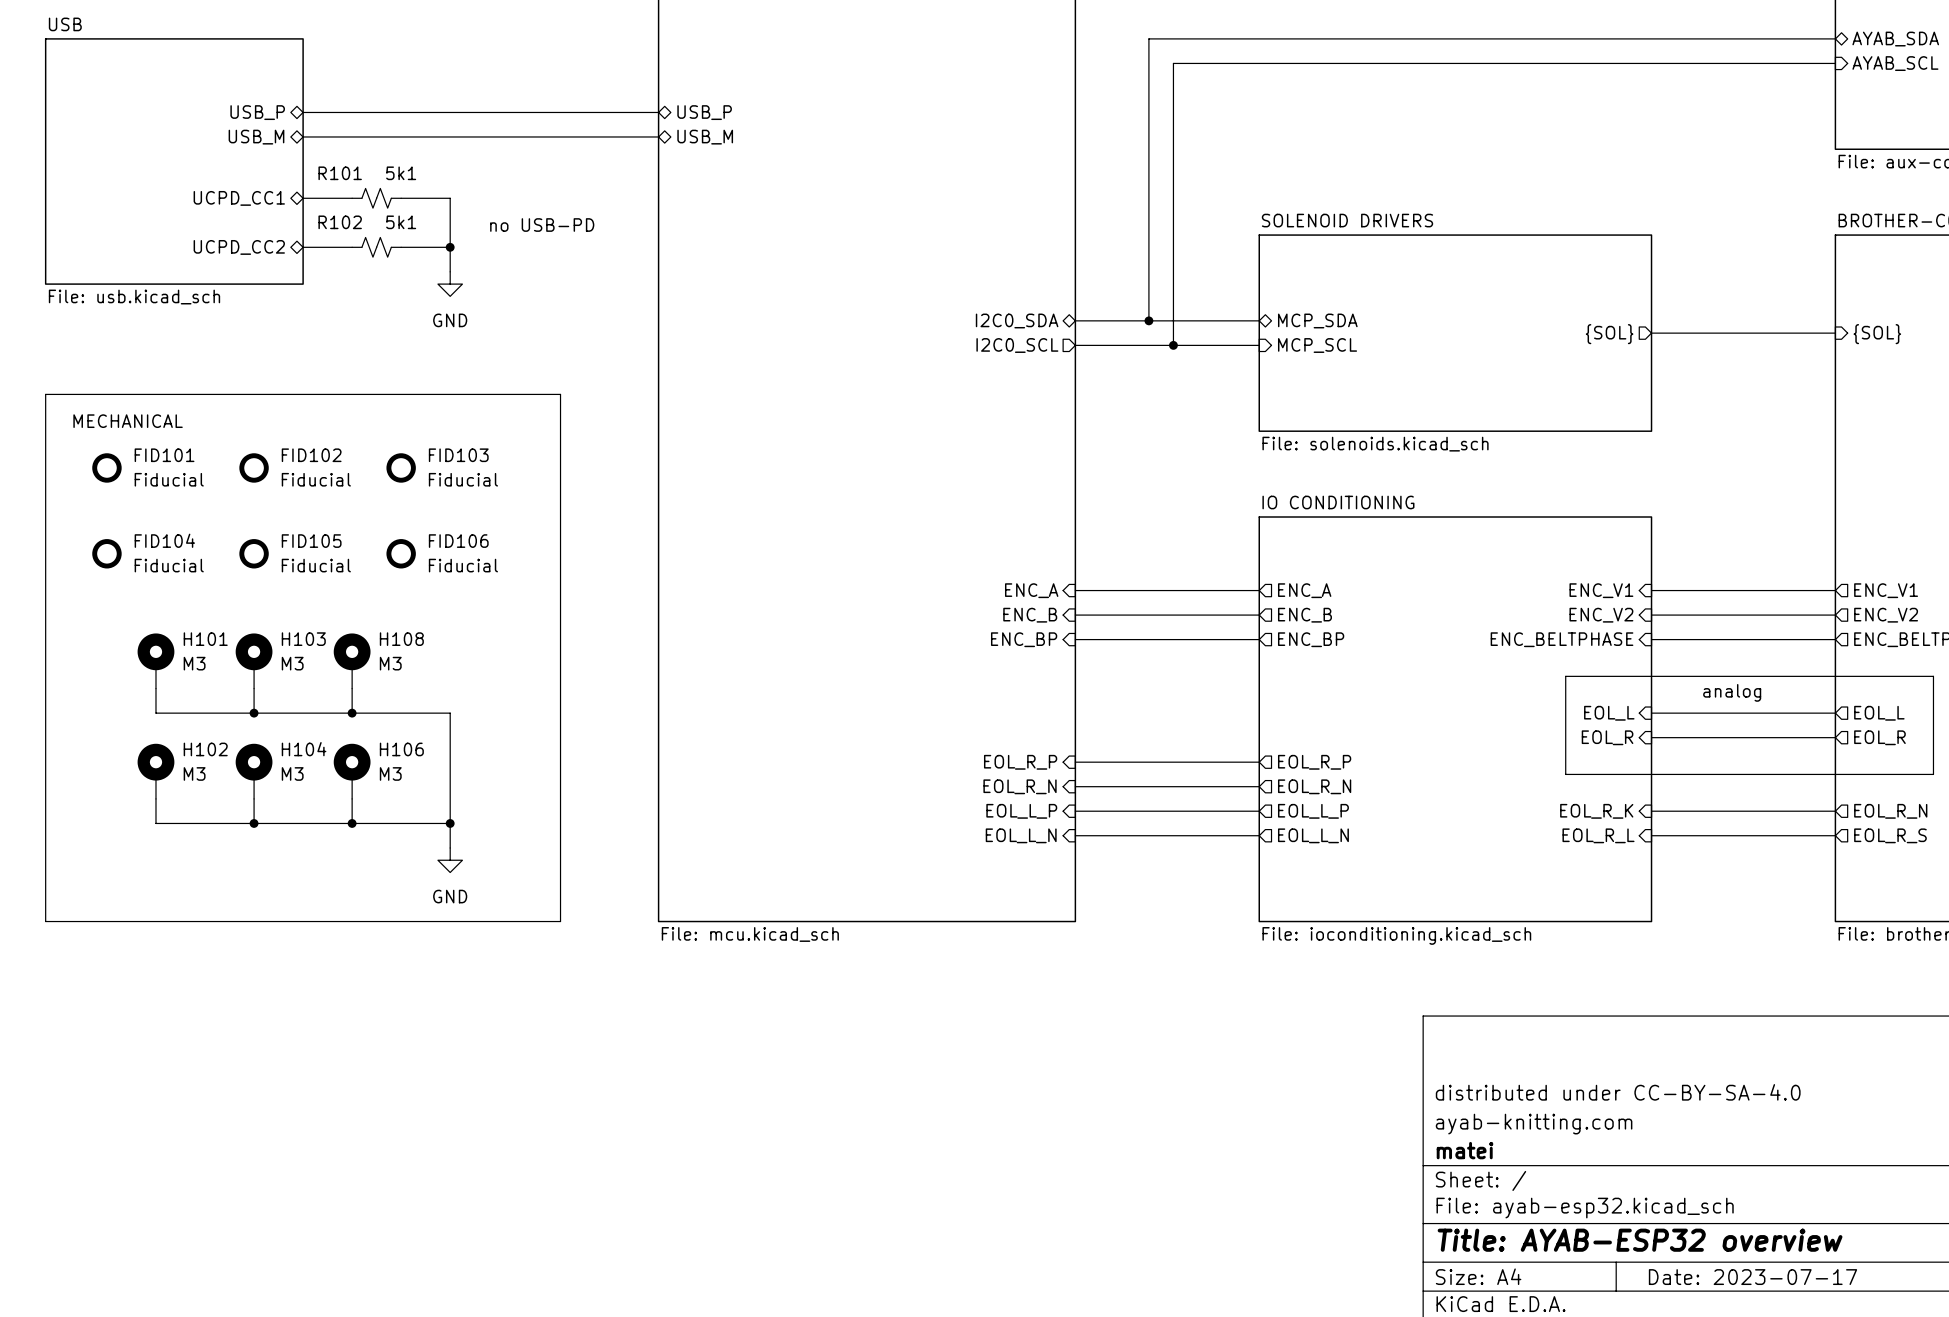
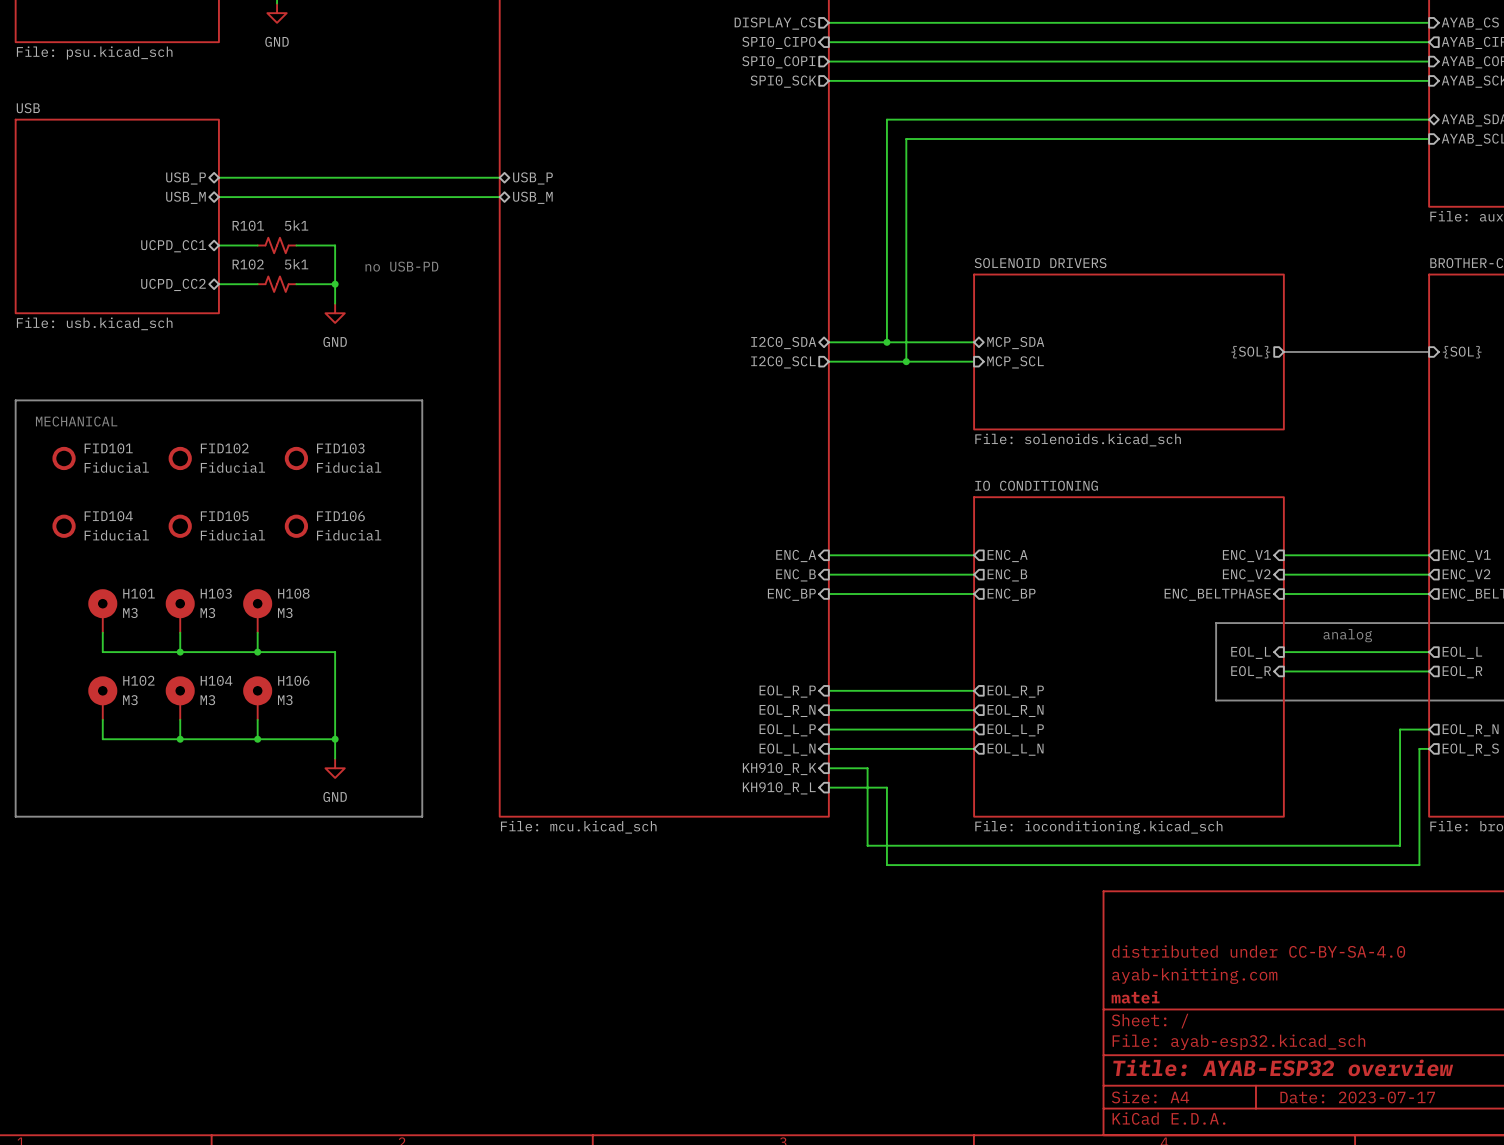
sheet pin: EOL_R_K (1596, 811) -> none
wire: (1651, 811) (1798, 811) -> (828, 768) (867, 768) (867, 845) (1400, 845) (1400, 729)
sheet pin: EOL_R_L (1598, 835) -> none
wire: (1651, 835) (1823, 835) -> (828, 787) (886, 787) (886, 865) (1419, 865) (1419, 748)
sheet pin: none -> KH910_R_K (779, 769)
sheet pin: none -> KH910_R_L (779, 788)

